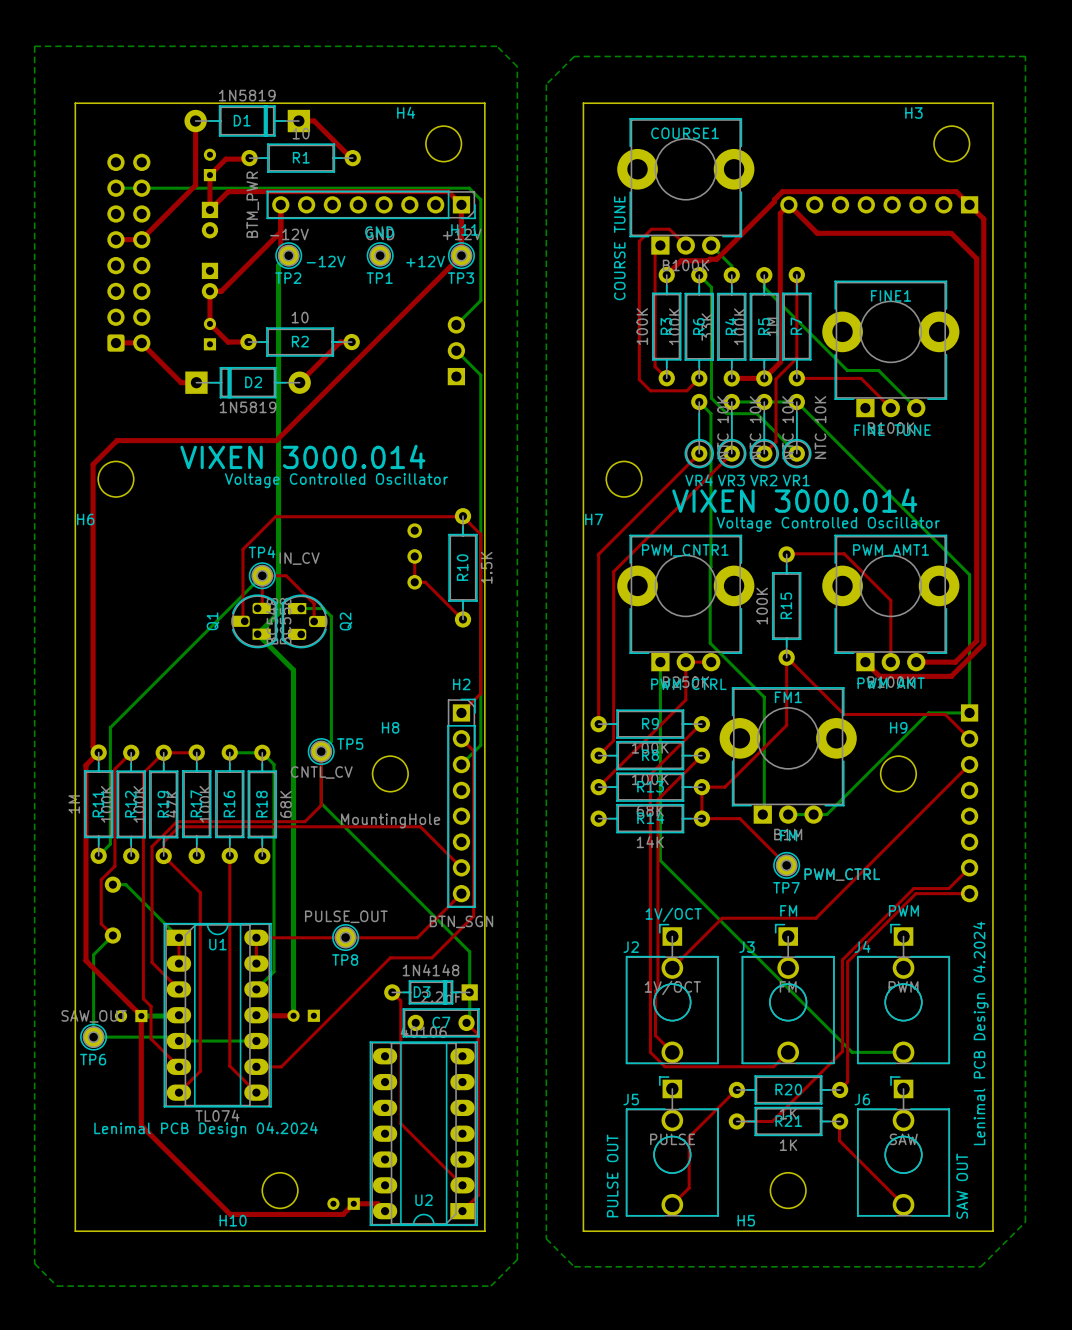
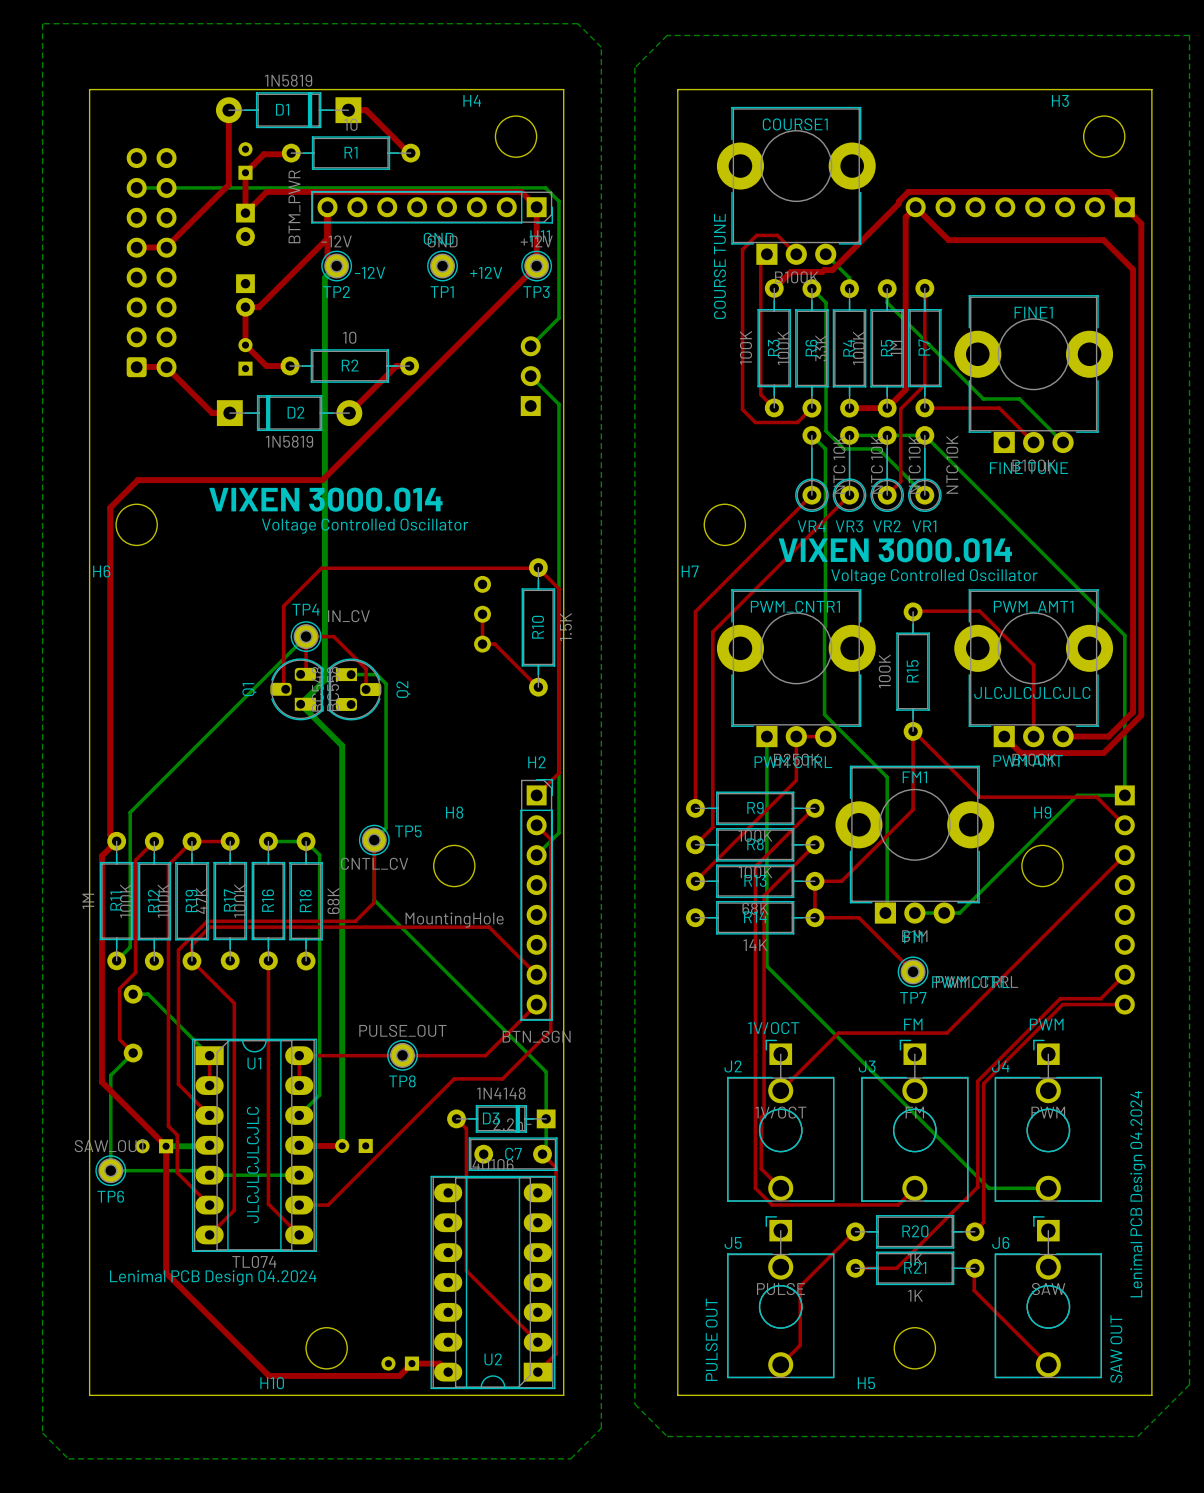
text: none -> JLCJLCJLCJLC (1032, 692)
text: none -> JLCJLCJLCJLC (252, 1165)

